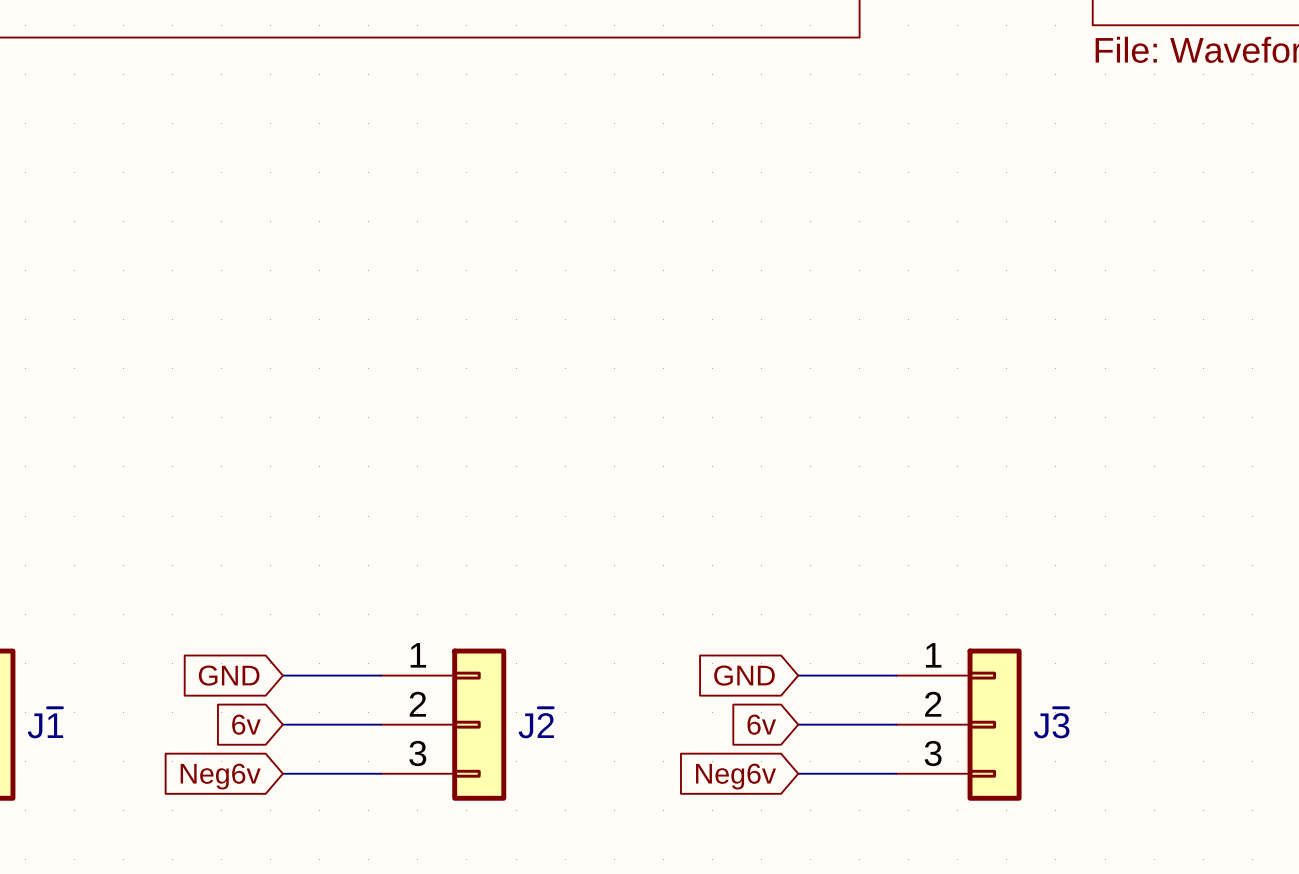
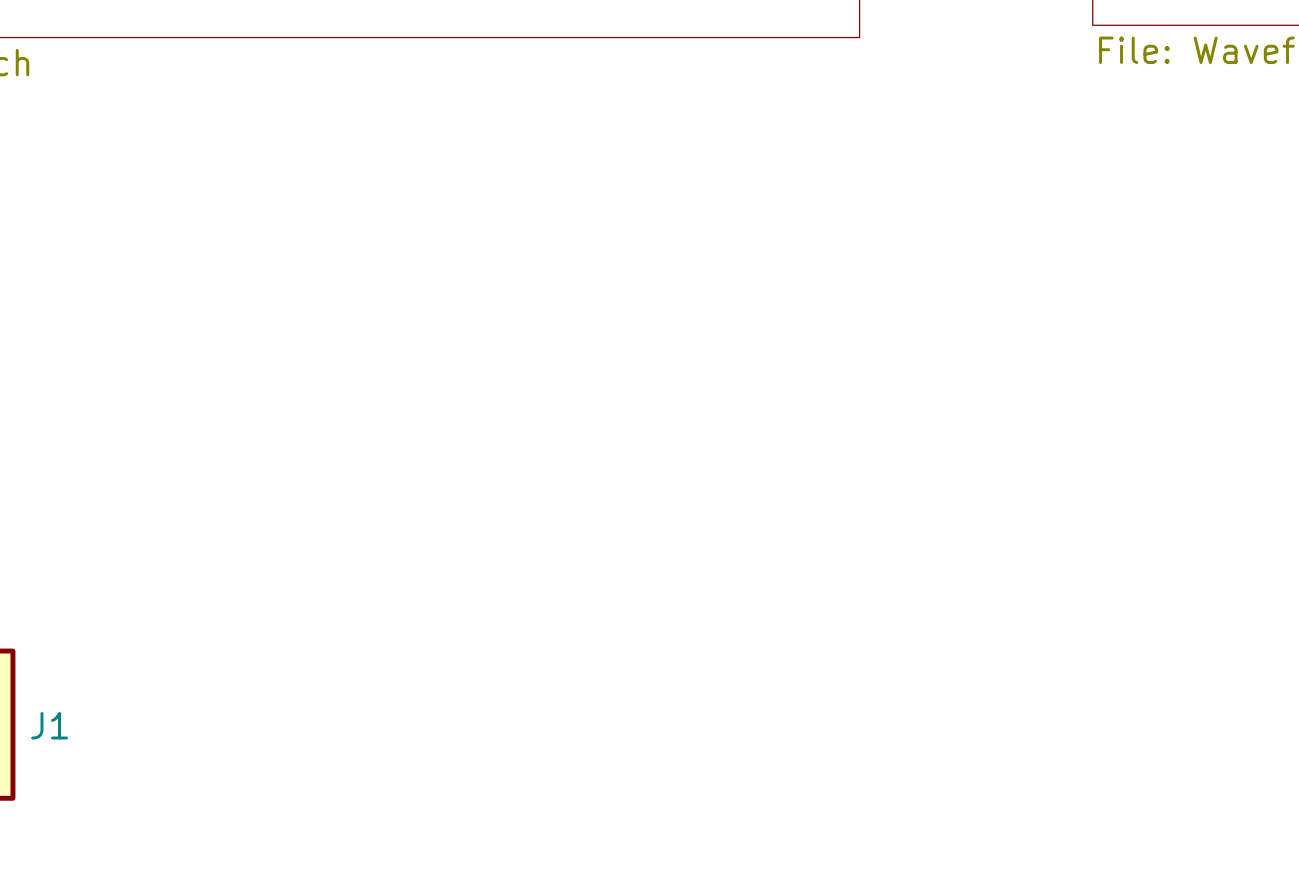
global label: GND (229, 675) -> none
wire: (282, 675) (381, 675) -> none
global label: GND (744, 675) -> none
wire: (798, 675) (896, 675) -> none
J~{1} name: J~{1} (45, 723) -> J1 (49, 725)
global label: 6v (246, 724) -> none
wire: (282, 724) (381, 724) -> none
J~{2}: (443, 724) -> none
global label: 6v (761, 724) -> none
wire: (798, 724) (896, 724) -> none
J~{3}: (958, 724) -> none
wire: (282, 773) (381, 773) -> none
wire: (798, 773) (896, 773) -> none
global label: Neg6v (220, 776) -> none
global label: Neg6v (736, 776) -> none

